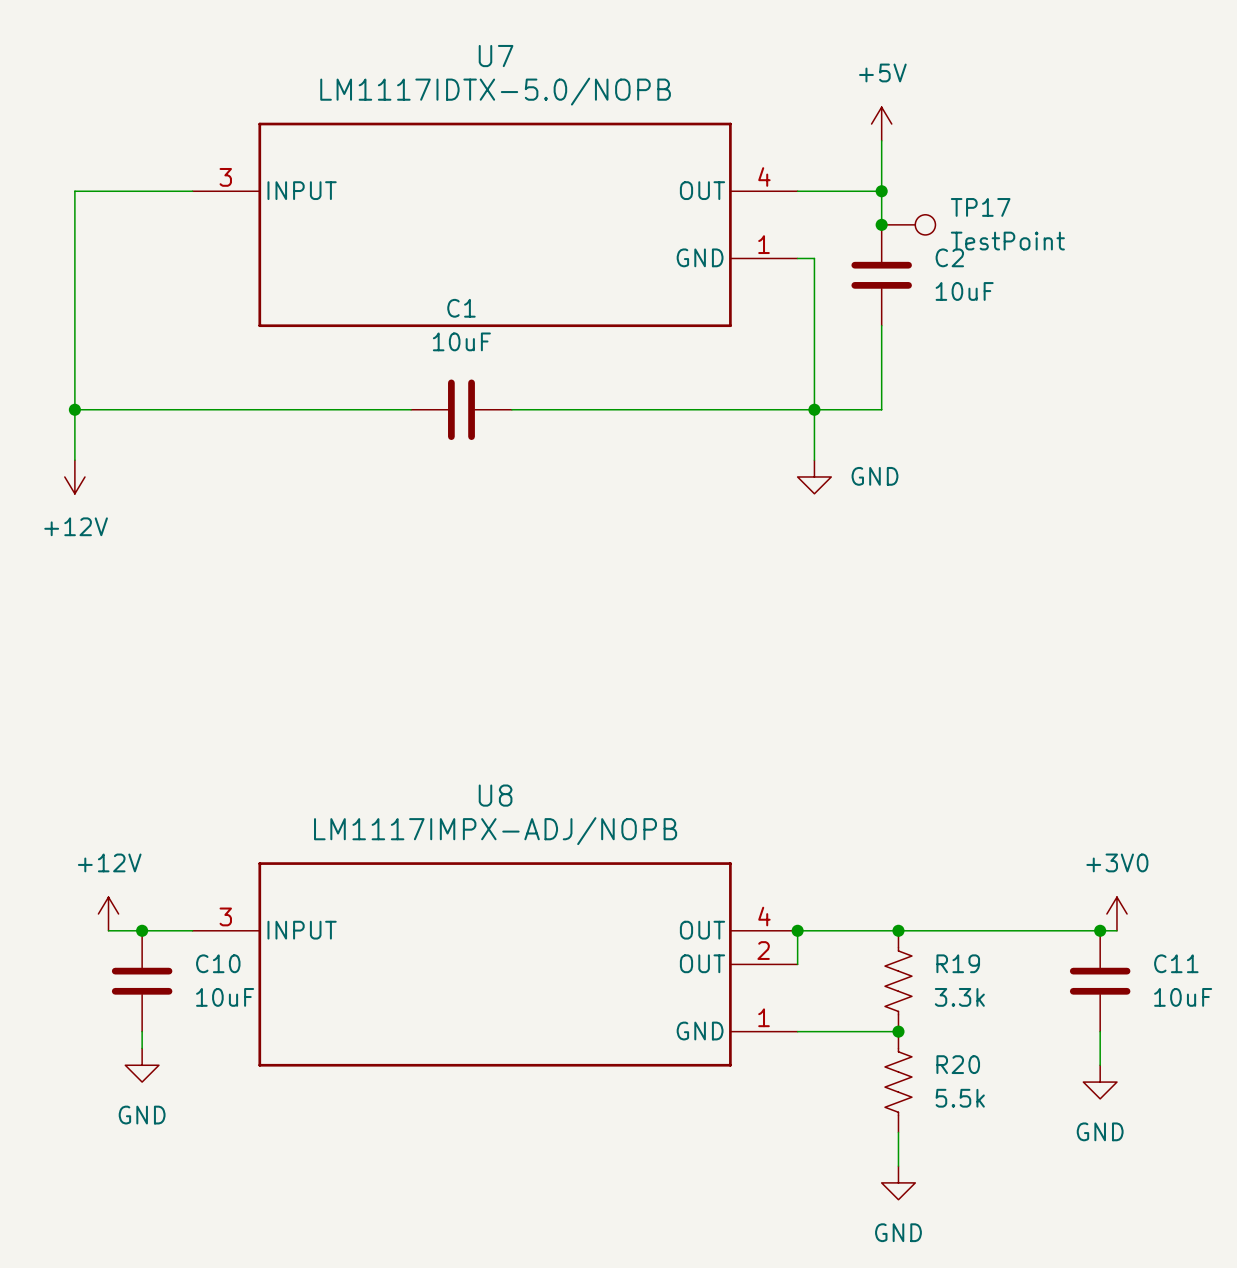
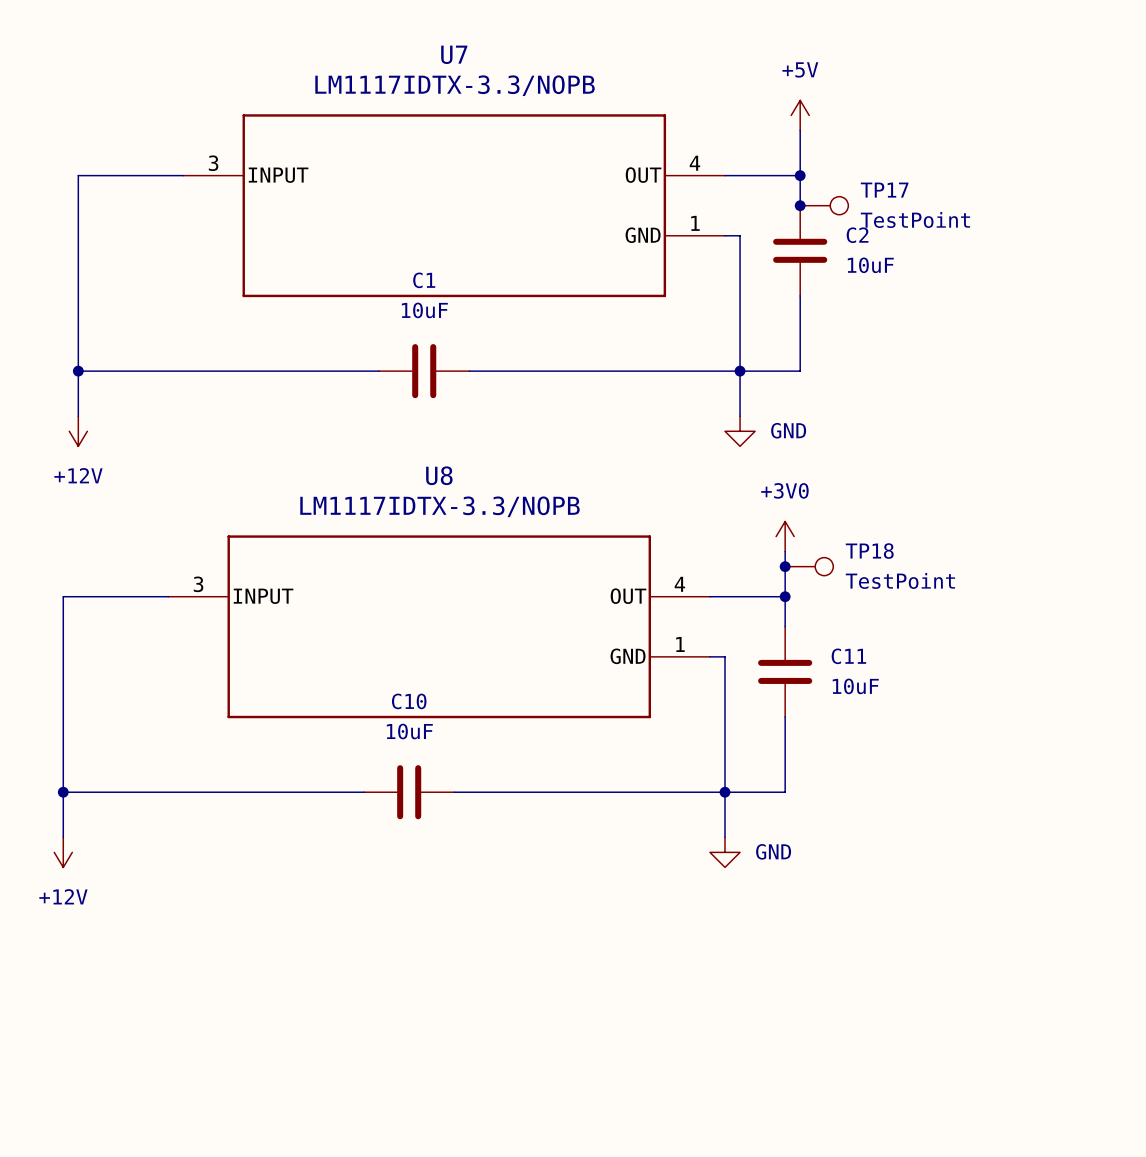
U7 value: LM1117IDTX-5.0/NOPB (495, 91) -> LM1117IDTX-3.3/NOPB (455, 85)
power symbol: none -> +3V0 (785, 536)
wire: none -> (785, 551) (785, 626)
junction: none -> (785, 566)
TP18: none -> TestPoint (809, 566)
wire: none -> (168, 596) (63, 596) (63, 837)
wire: none -> (709, 596) (785, 596)
junction: none -> (785, 596)
wire: none -> (709, 656) (725, 656) (725, 837)
wire: none -> (785, 717) (785, 792) (454, 792)
U8 value: LM1117IMPX-ADJ/NOPB (495, 831) -> LM1117IDTX-3.3/NOPB (439, 506)
U8 symbol: [192, 862, 798, 1067] -> [168, 535, 710, 719]
wire: none -> (63, 792) (364, 792)
junction: none -> (63, 792)
power symbol rotation: 0° (108, 913) -> 180° (63, 852)
power symbol position: +12V (108, 913) -> +12V (63, 852)
power symbol: +3V0 (1116, 913) -> none
wire: (108, 930) (192, 930) -> none
junction: (142, 930) -> none
junction position: (797, 930) -> (725, 792)
junction: (898, 930) -> none
junction: (1100, 930) -> none
wire: (1116, 930) (797, 930) (797, 964) -> none
power symbol: none -> GND (725, 852)
C10 name position: C10 (218, 963) -> C10 (409, 701)
C10 rotation: 0° (142, 981) -> 90° clockwise (409, 792)
C10 position: (142, 981) -> (409, 792)
R19: 3.3k (898, 981) -> none
C11 position: (1100, 981) -> (785, 671)
C10 value position: 10uF (225, 997) -> 10uF (409, 731)
wire: (142, 1031) (142, 1048) -> none
wire: (797, 1031) (898, 1031) -> none
junction: (898, 1031) -> none
wire: (1100, 1031) (1100, 1065) -> none
power symbol: GND (142, 1065) -> none
R20: 5.5k (898, 1082) -> none
power symbol: GND (1100, 1082) -> none
wire: (898, 1132) (898, 1166) -> none
power symbol: GND (898, 1182) -> none

